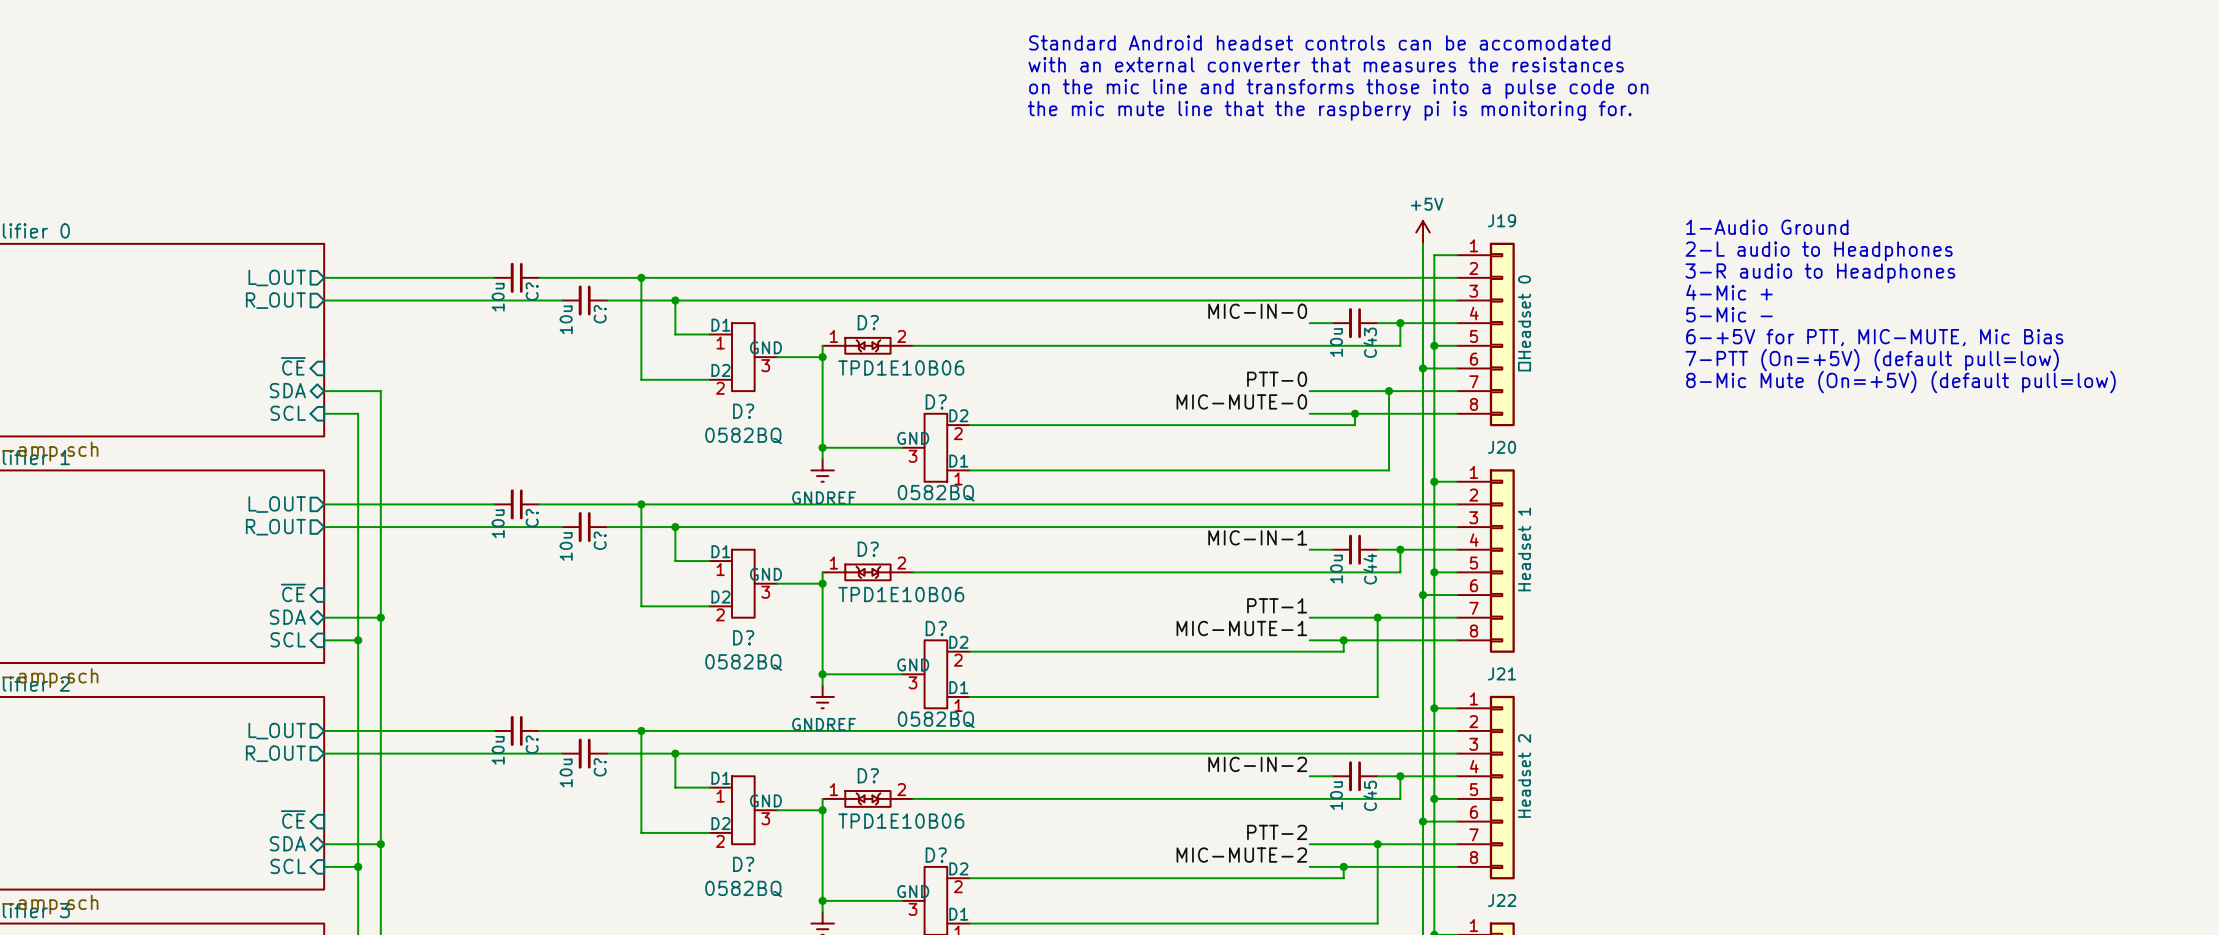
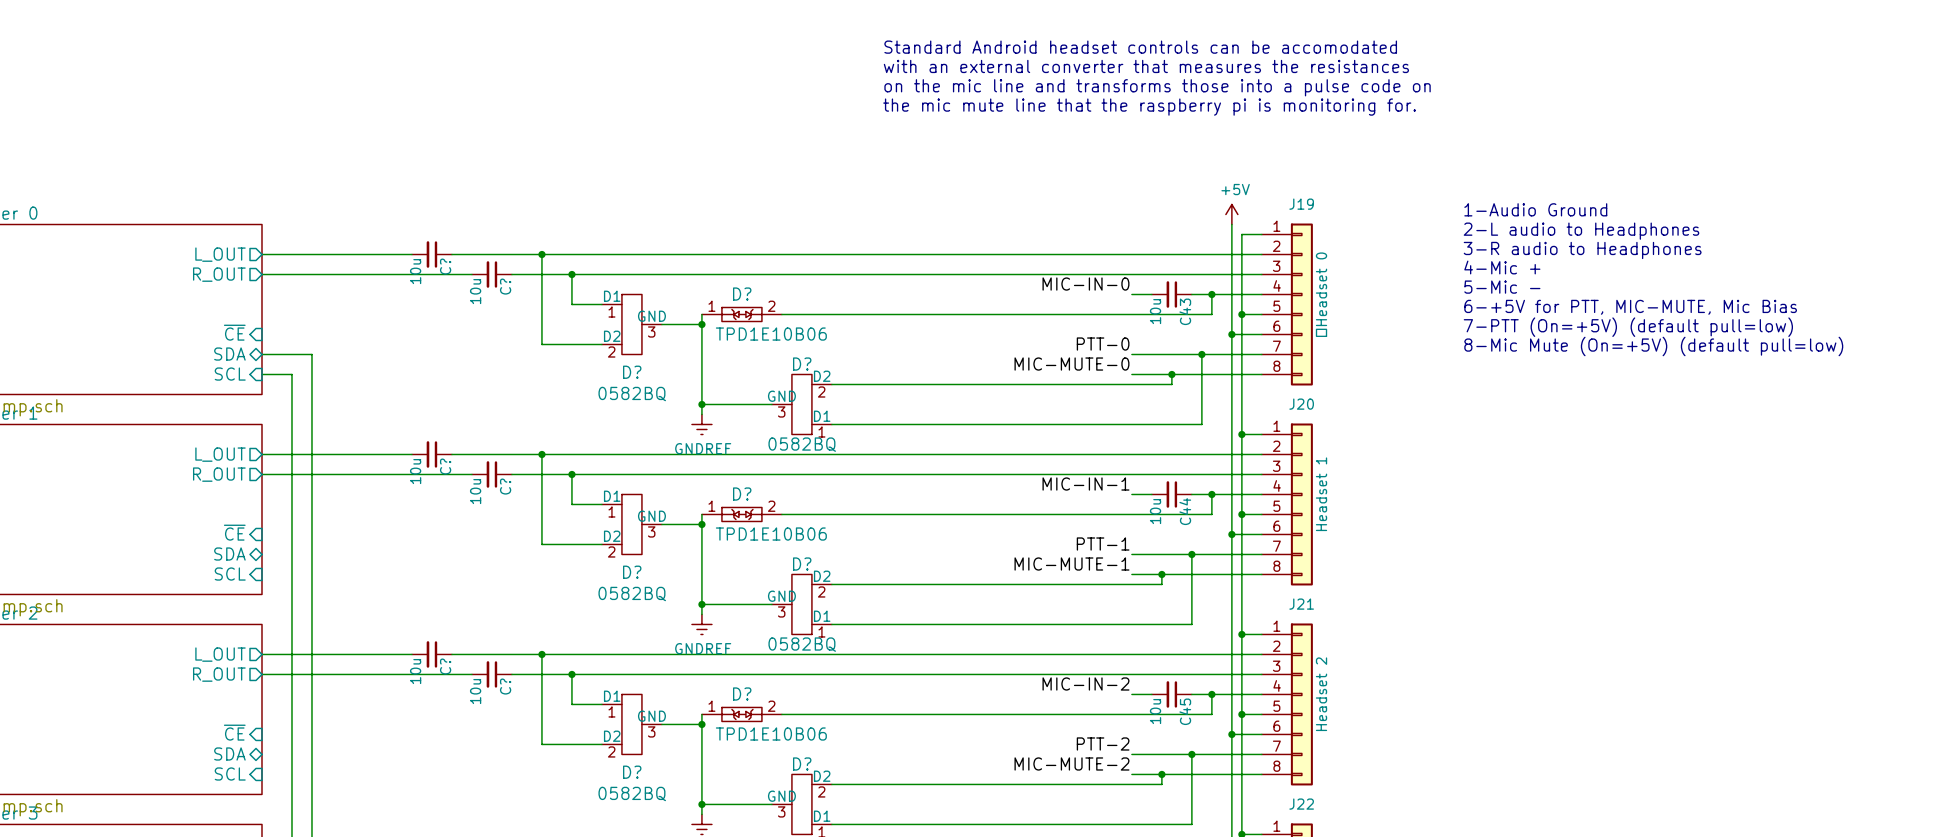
wire: (324, 617) (380, 617) -> none
junction: (380, 617) -> none
wire: (324, 640) (358, 640) -> none
junction: (358, 640) -> none
wire: (324, 844) (380, 844) -> none
junction: (380, 844) -> none
wire: (324, 866) (358, 866) -> none
junction: (358, 866) -> none

